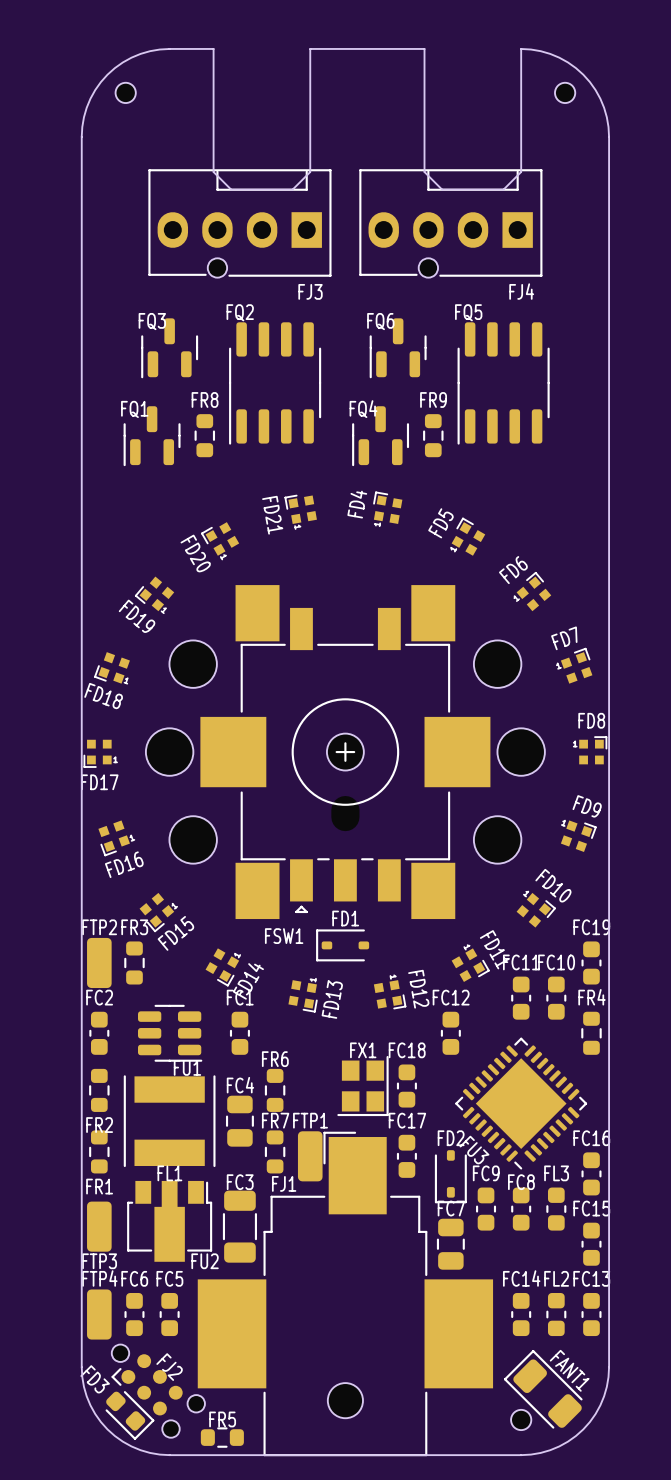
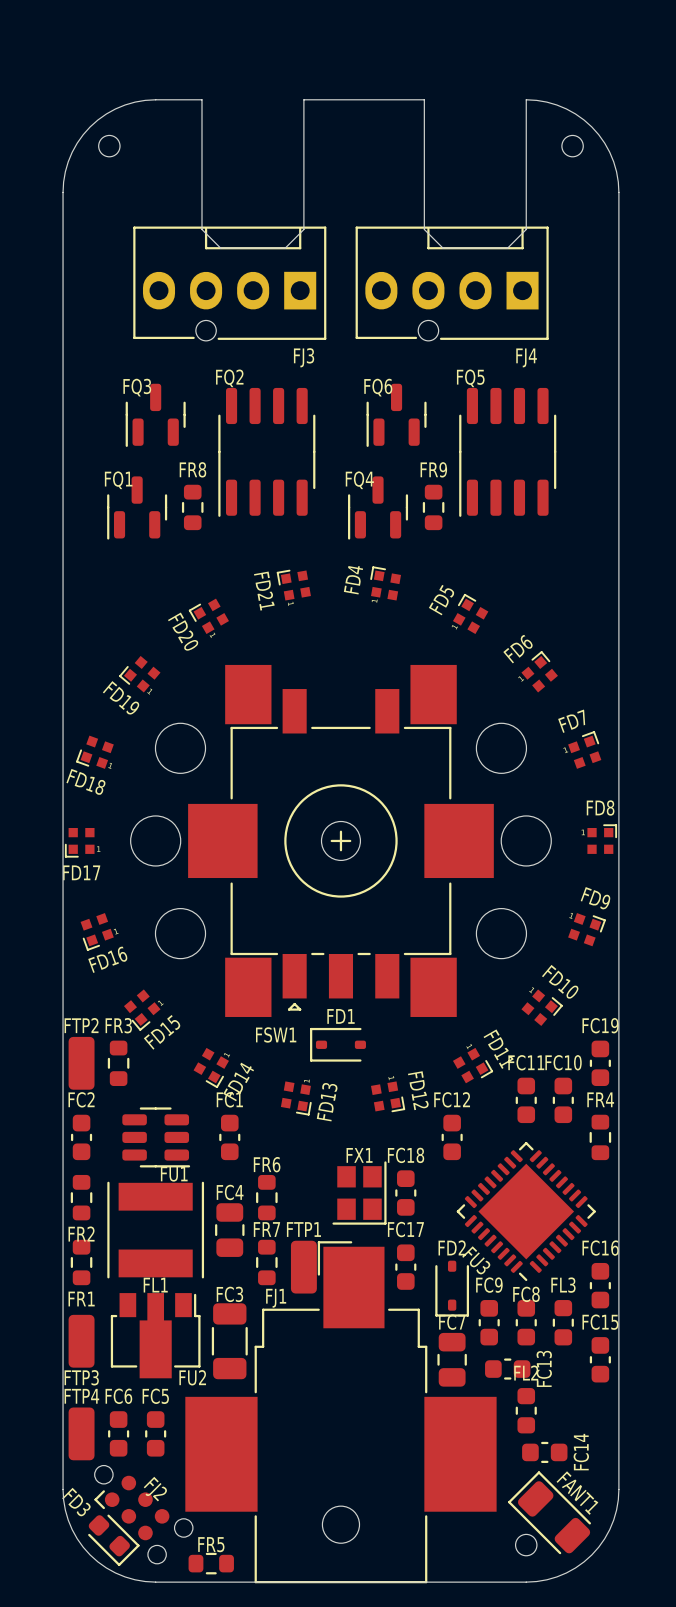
FC14 rotation: 0° (521, 1314) -> 90° clockwise (544, 1452)
FL2 position: (556, 1314) -> (526, 1410)
FC13 rotation: 0° (591, 1314) -> 90° clockwise (507, 1369)
FC13 position: (591, 1314) -> (507, 1369)

